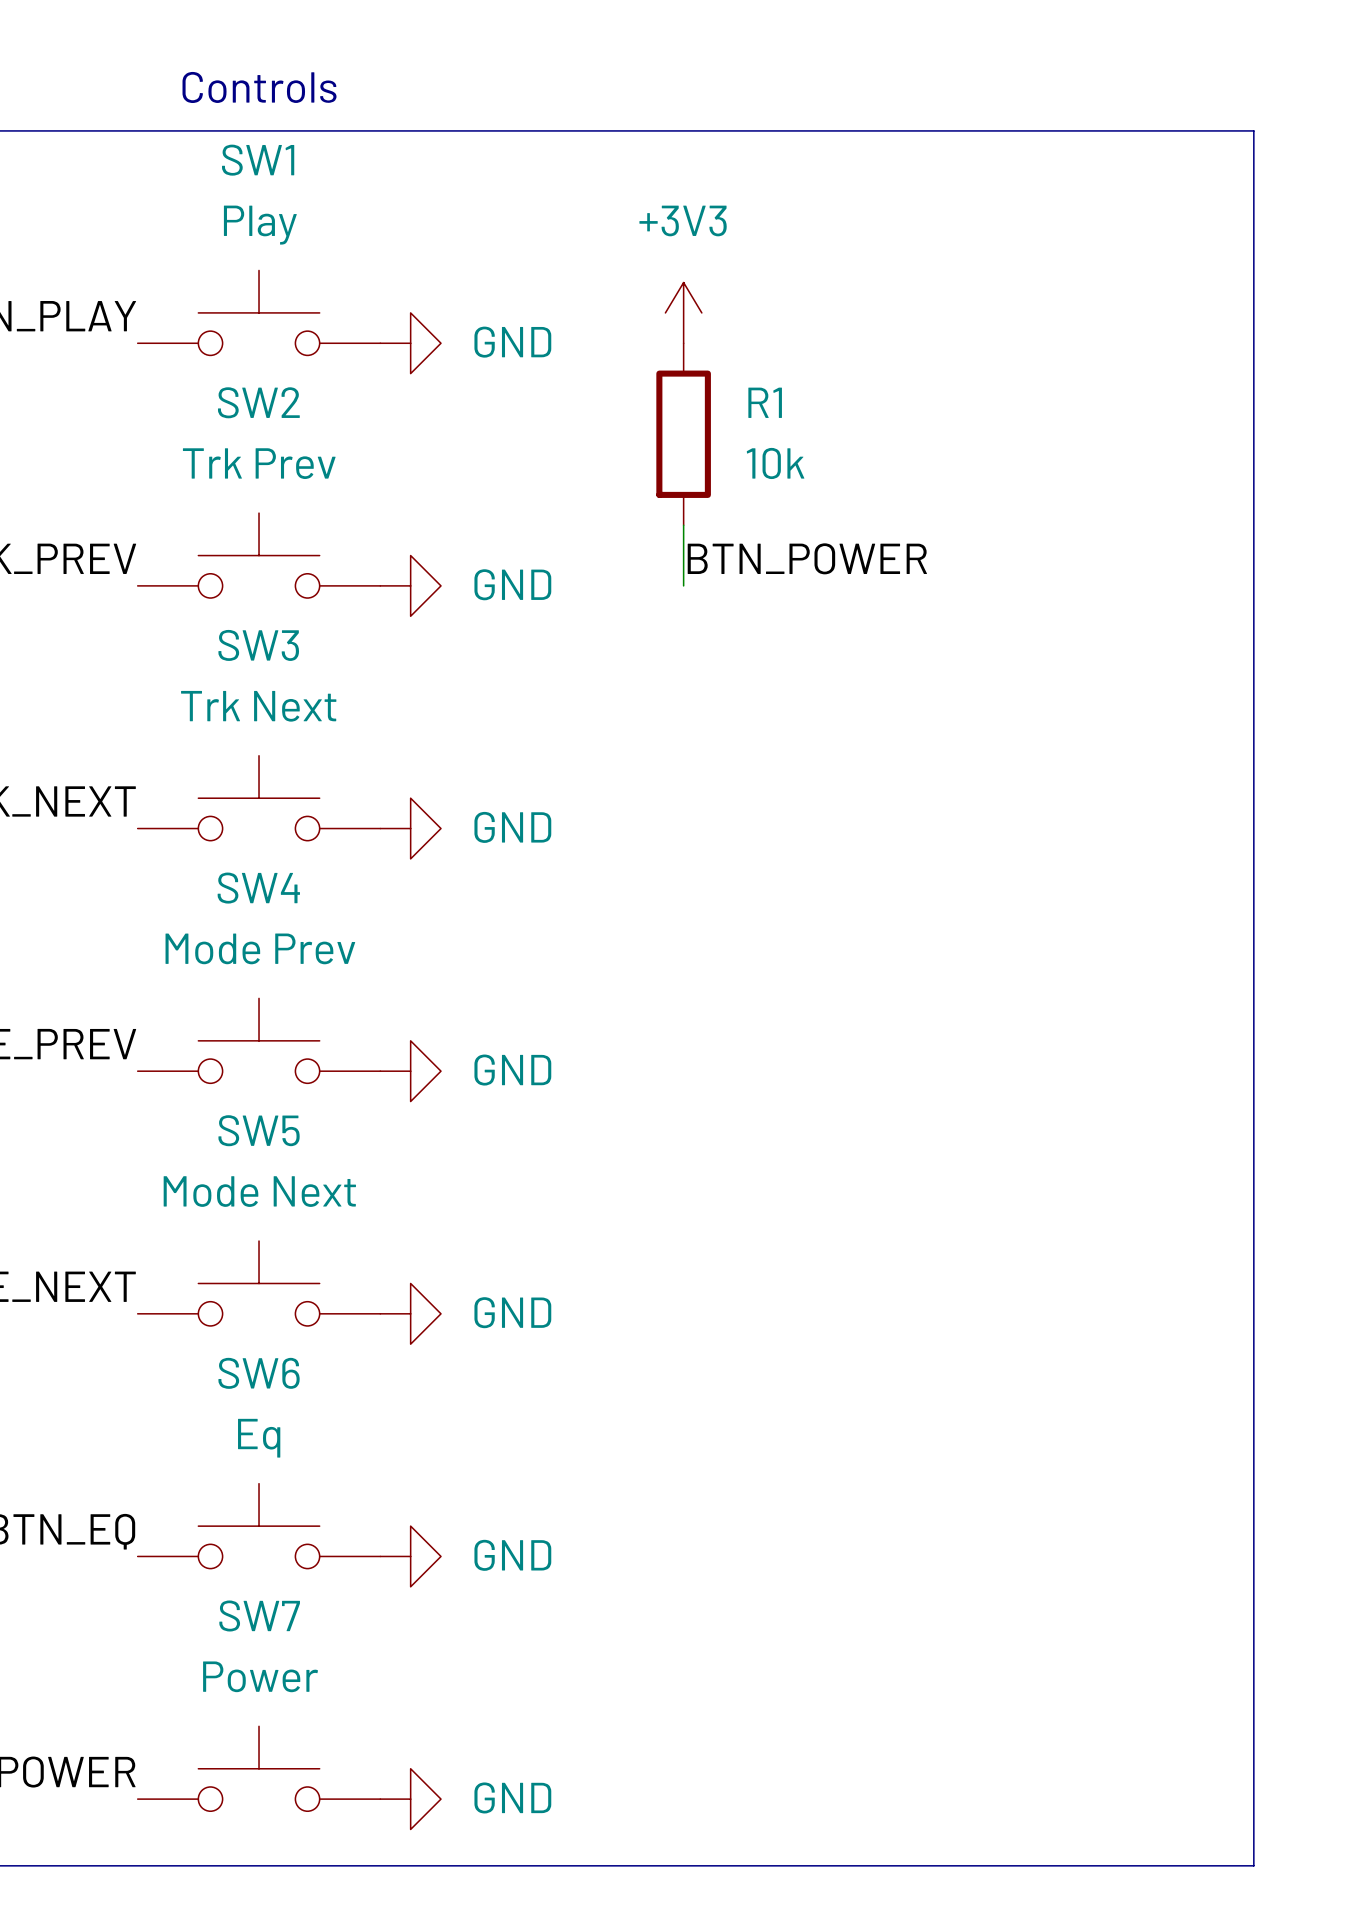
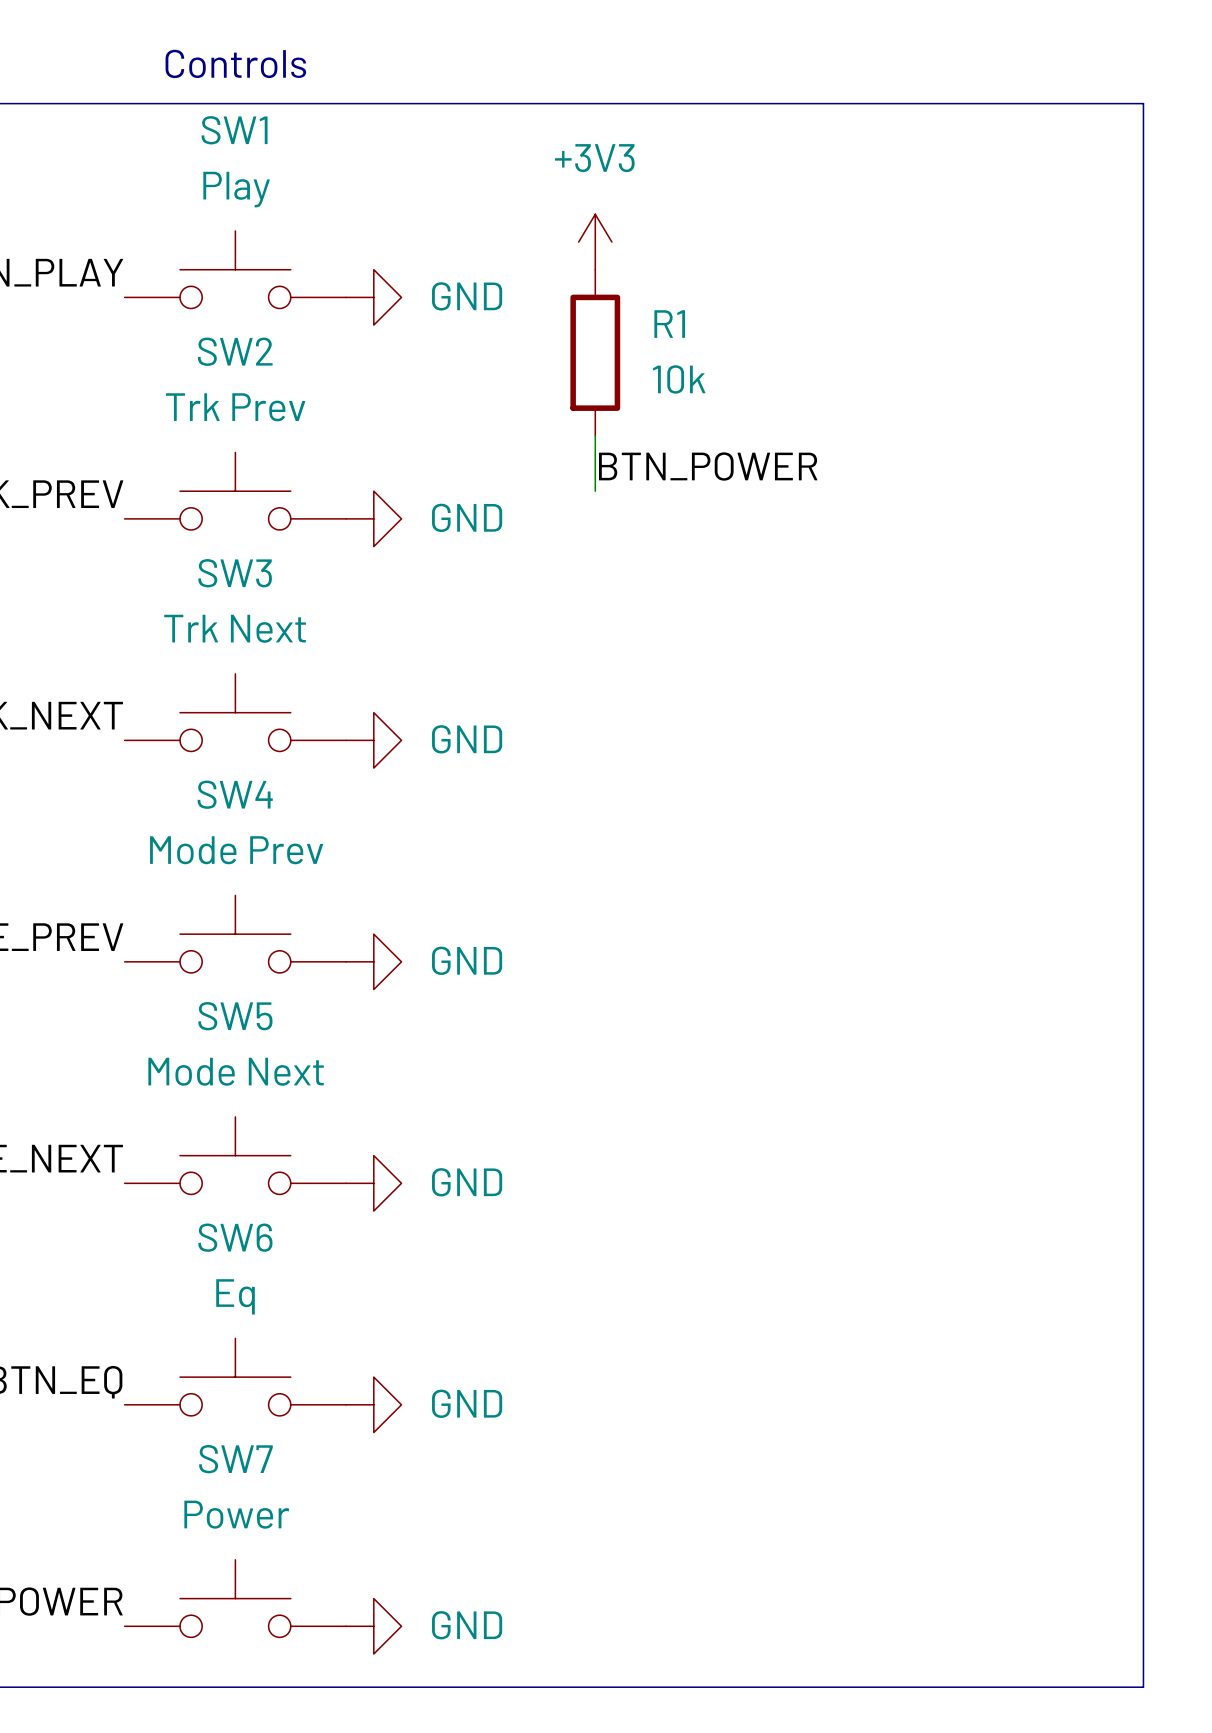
power symbol position: +3V3 (683, 312) -> +3V3 (595, 242)
R1 position: (683, 434) -> (595, 352)
wire: (683, 525) (683, 585) -> (595, 435) (595, 491)
label position: BTN_POWER (807, 558) -> BTN_POWER (708, 466)

